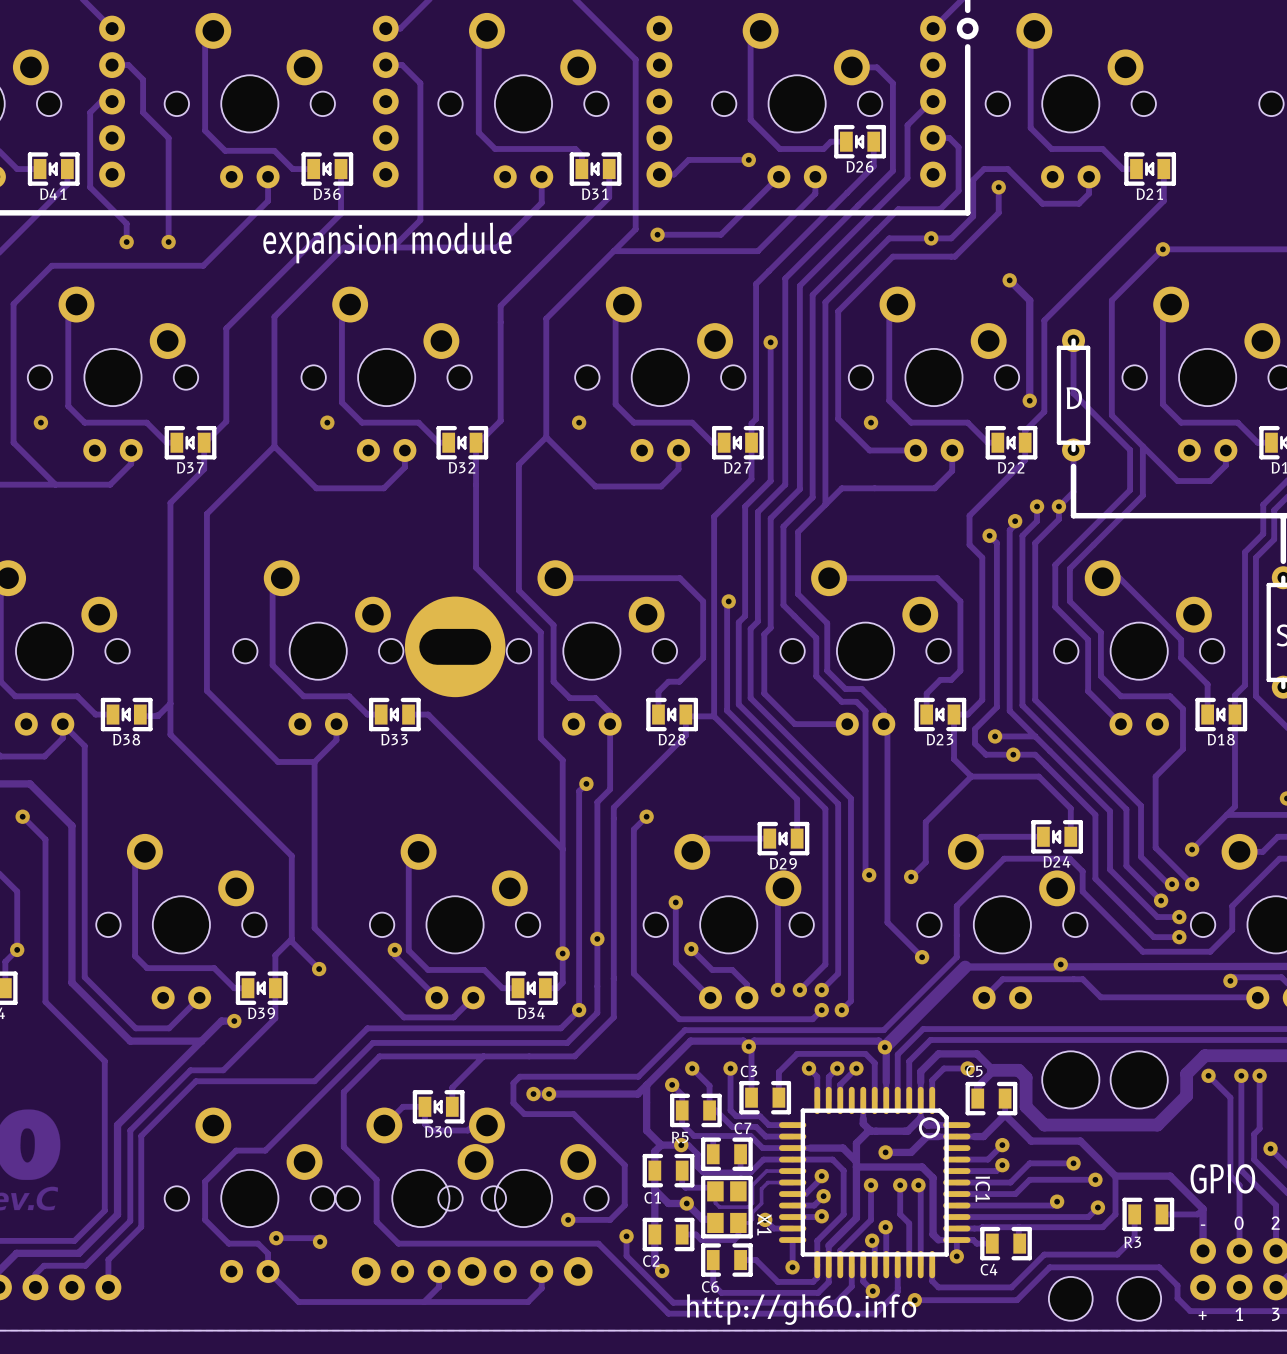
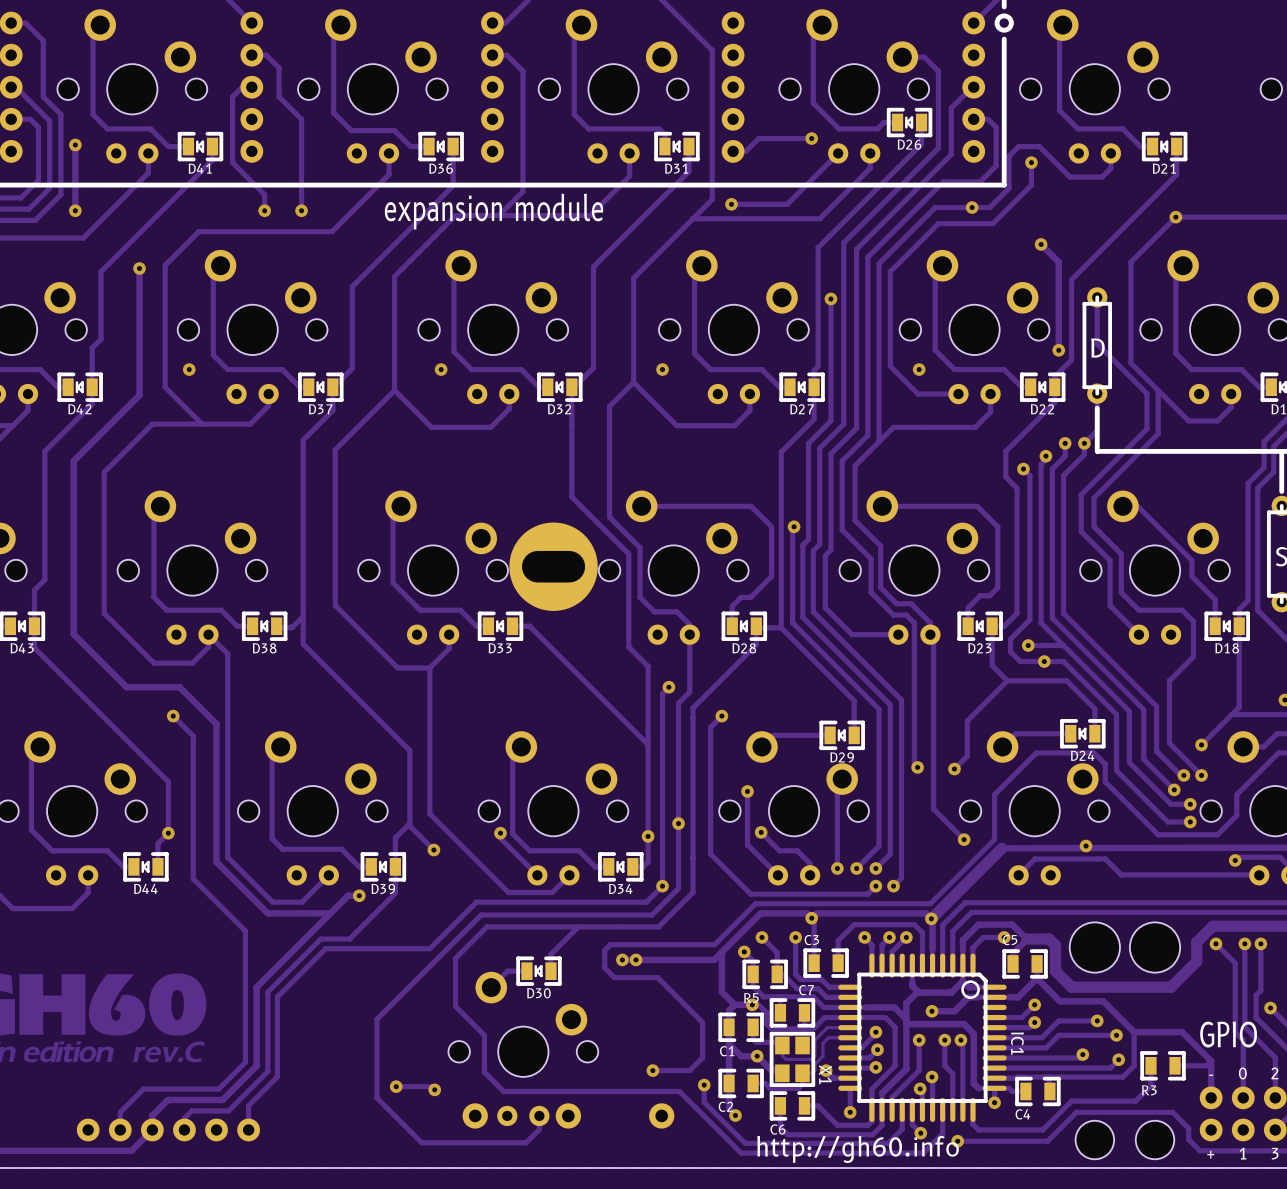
track: (424, 1106) (424, 1124) (431, 1130) (467, 1130) (472, 1125) (486, 1125) -> none
track: (265, 1150) (236, 1150) (205, 1181) (205, 1219) (228, 1243) (258, 1243) (268, 1253) (268, 1271) (298, 1302) (305, 1302) -> (386, 1009) (376, 1019) (376, 1097) (421, 1142)
part: (249, 1167) -> none
part: (523, 1167) -> none
part: (249, 1271) -> none
part: (523, 1271) -> none
track: (541, 1271) (541, 1288) (528, 1302) (424, 1302) -> none

